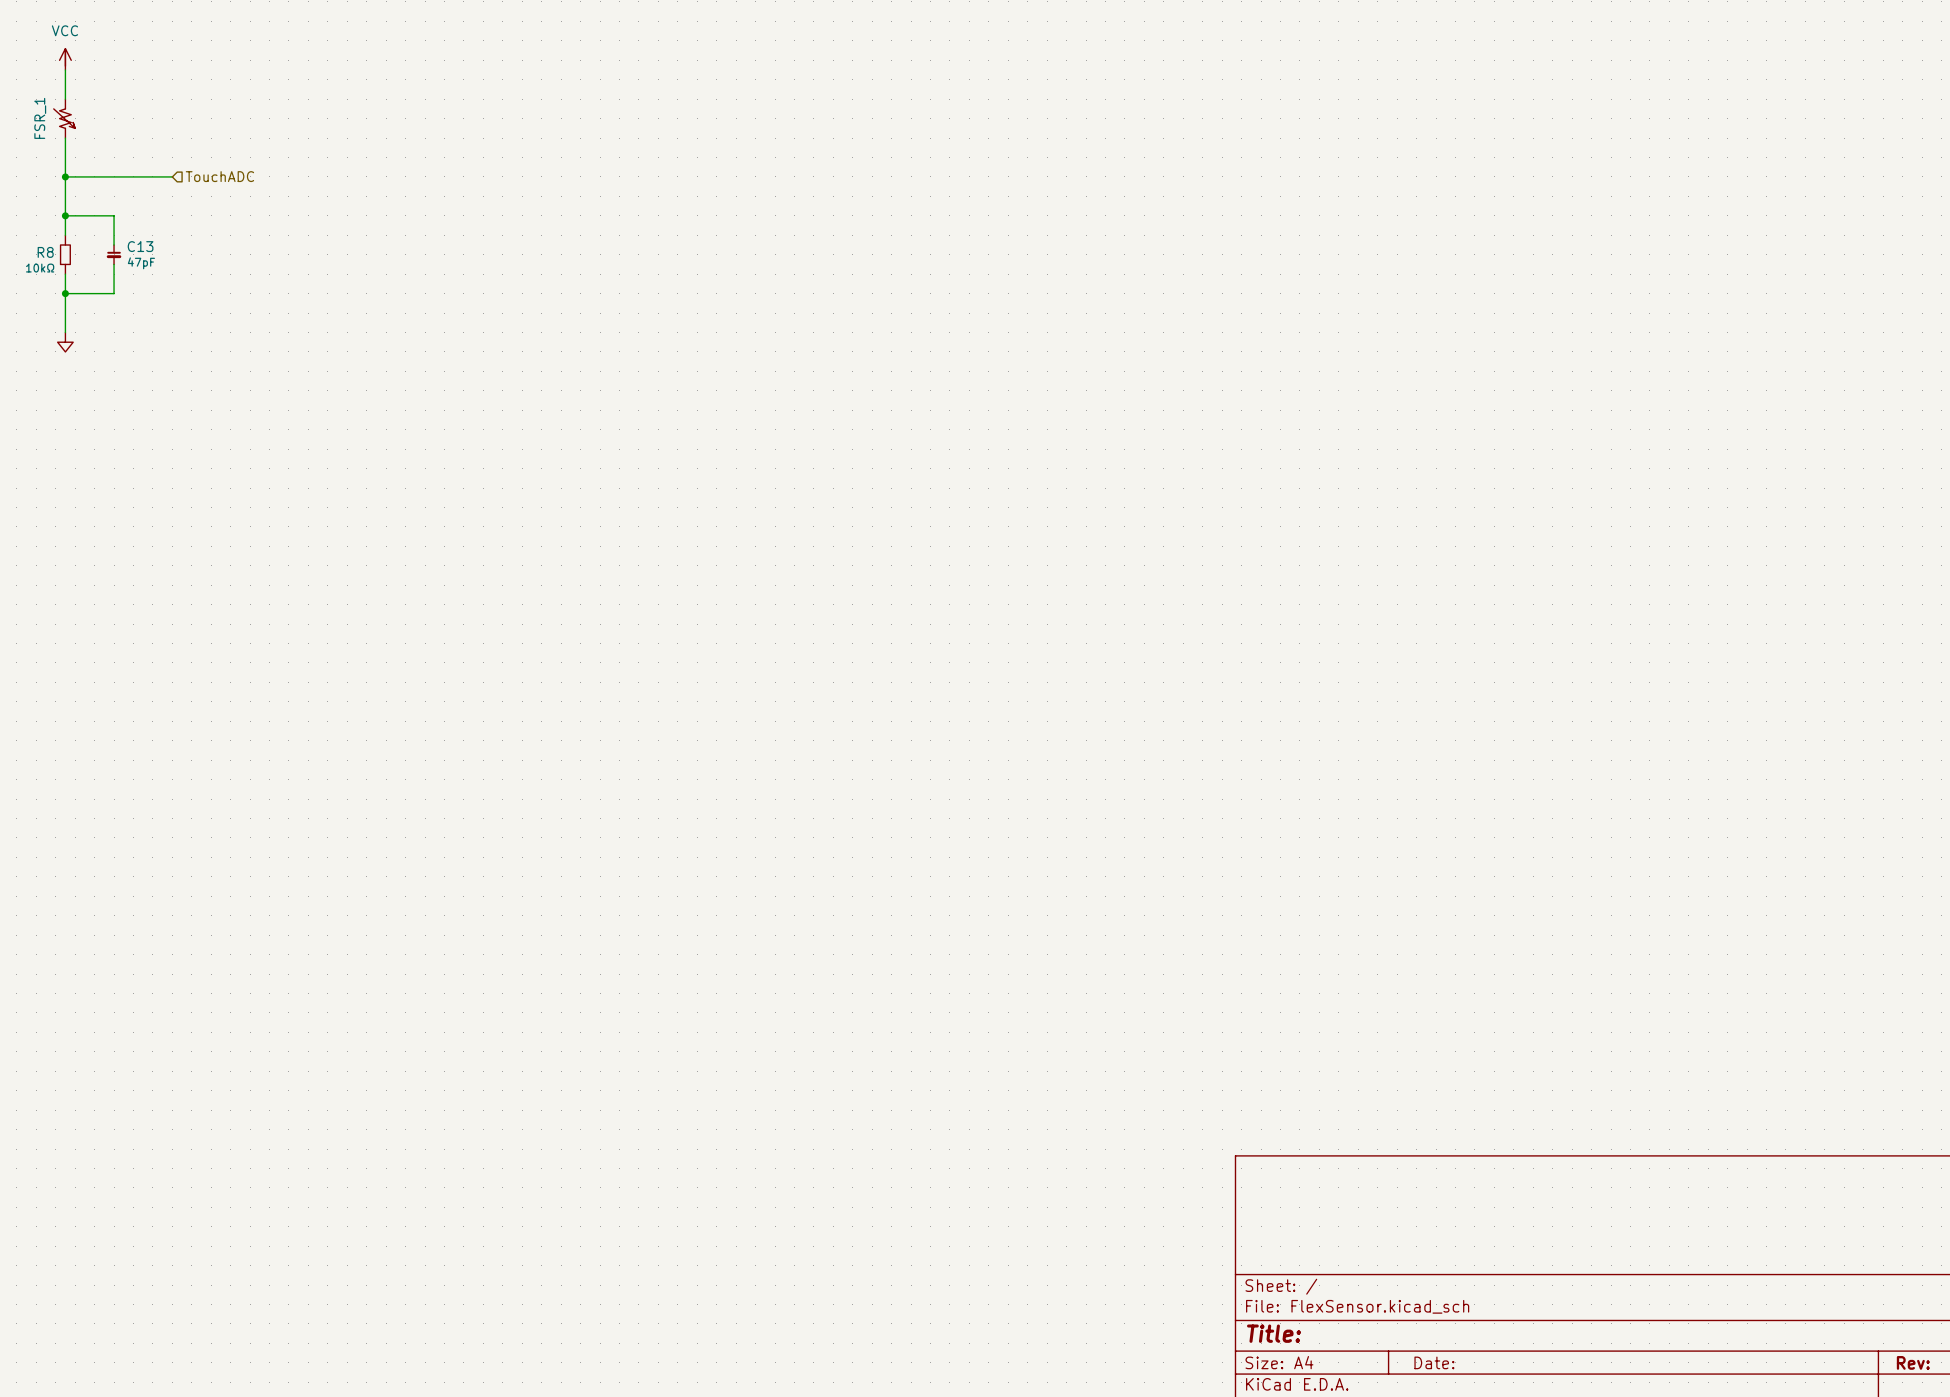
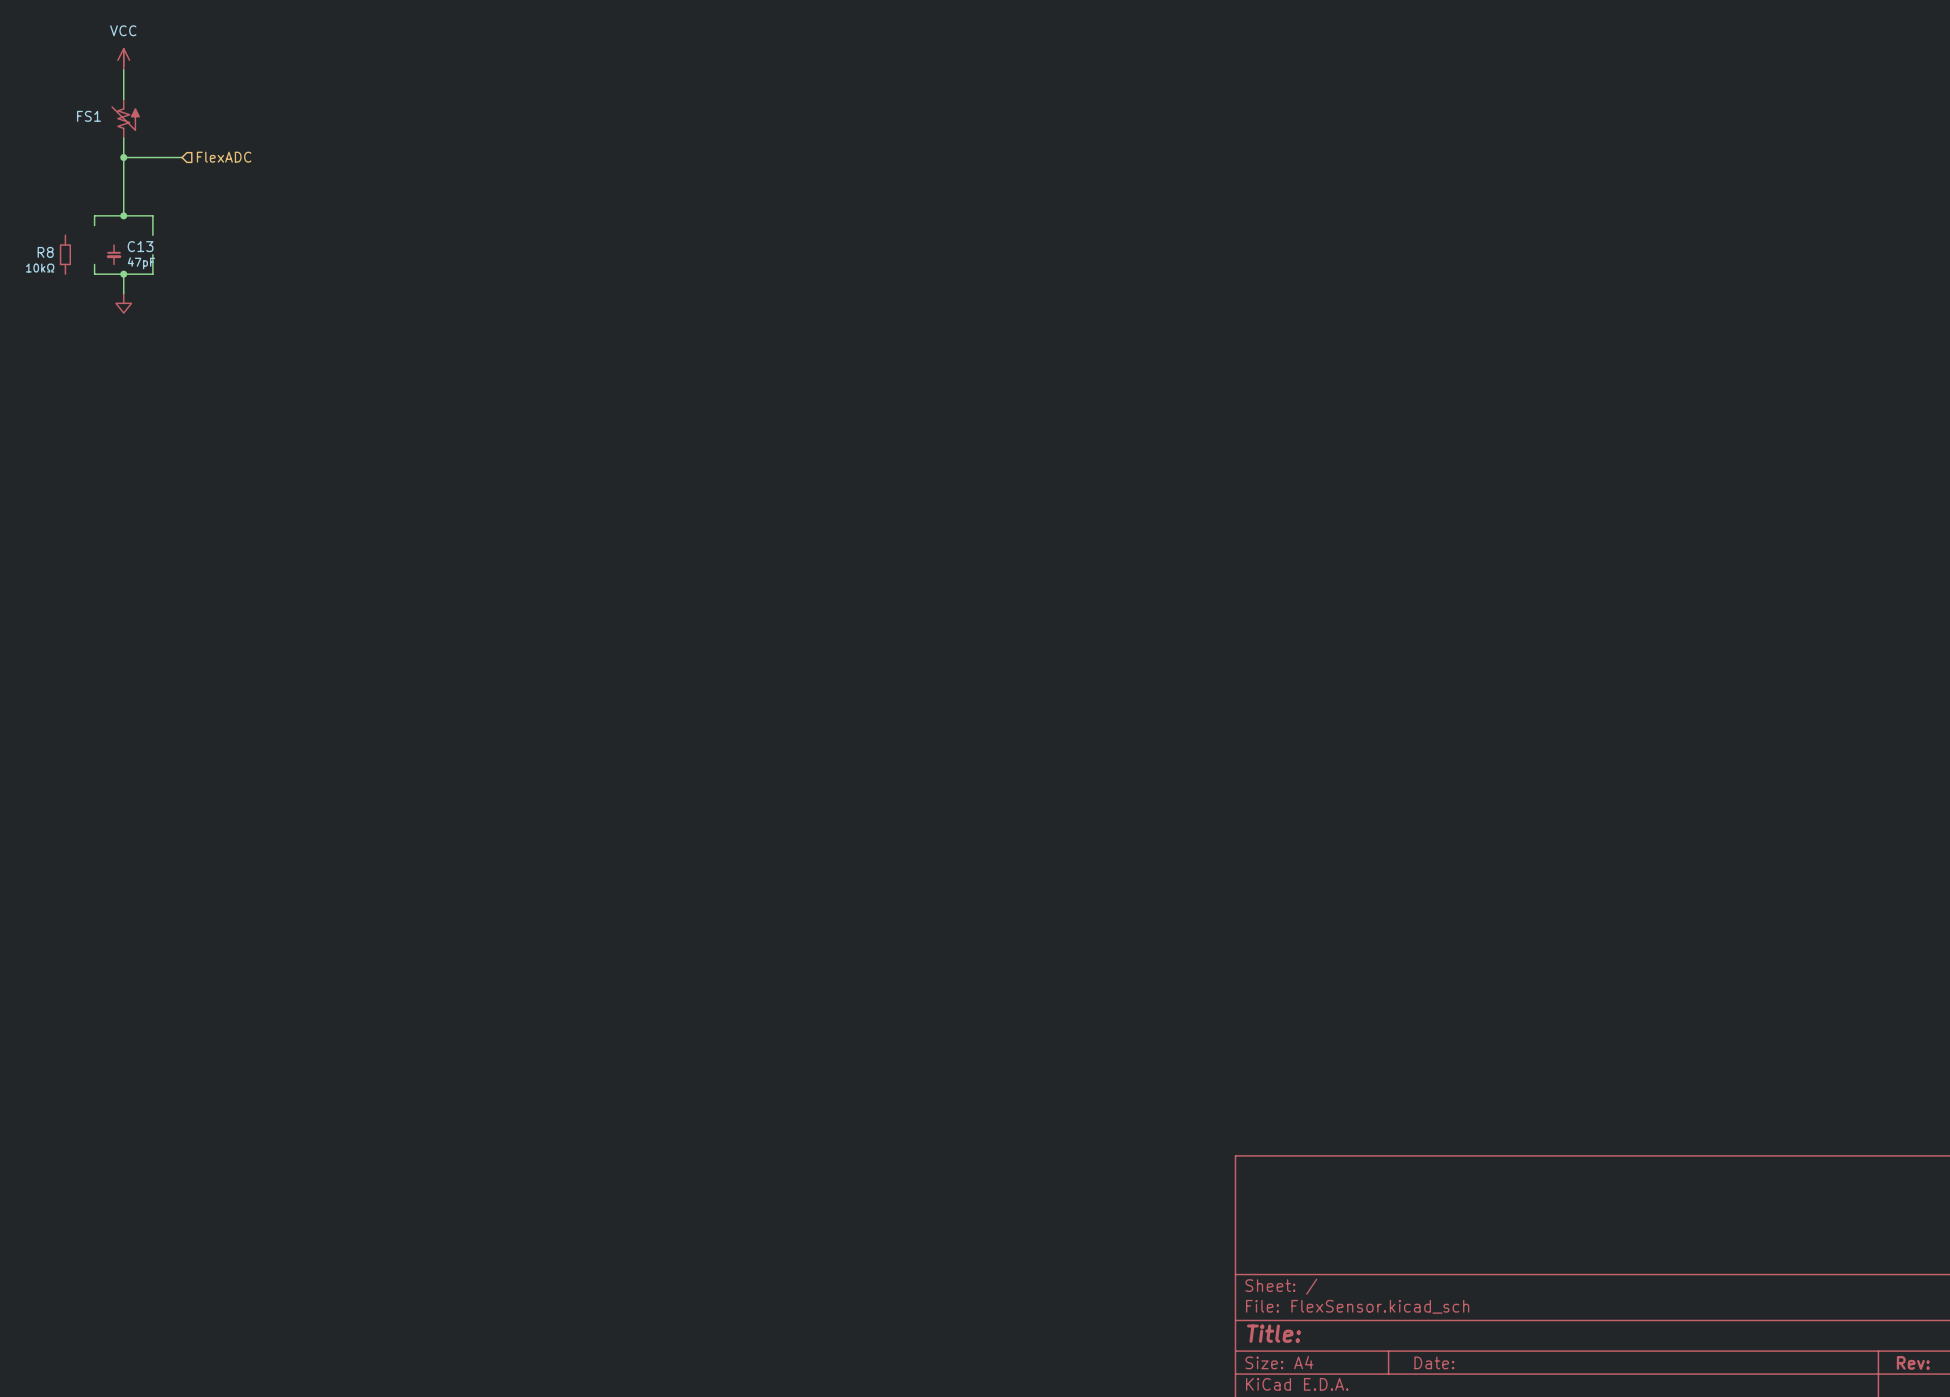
power symbol position: VCC (65, 59) -> VCC (123, 59)
wire: (65, 70) (65, 99) -> (123, 70) (123, 99)
FSR_1: (64, 118) -> none
FS1: none -> (125, 118)
wire: (65, 138) (65, 235) -> none
wire: none -> (123, 138) (123, 215)
wire: none -> (123, 157) (182, 157)
junction: none -> (123, 157)
hierarchical label: none -> FlexADC (224, 157)
wire: (65, 176) (172, 176) -> none
junction: (65, 176) -> none
hierarchical label: TouchADC (219, 176) -> none
wire: (65, 215) (94, 215) -> (94, 225) (94, 215)
junction: (65, 215) -> none
wire: (114, 215) (114, 245) -> (114, 215) (152, 215) (152, 235)
junction: none -> (123, 215)
wire: none -> (152, 254) (152, 274) (94, 274) (94, 264)
wire: (114, 264) (114, 293) (65, 293) -> none
wire: (65, 274) (65, 332) -> none
wire: none -> (123, 274) (123, 293)
junction: none -> (123, 274)
junction: (65, 293) -> none
power symbol position: (65, 342) -> (123, 303)

